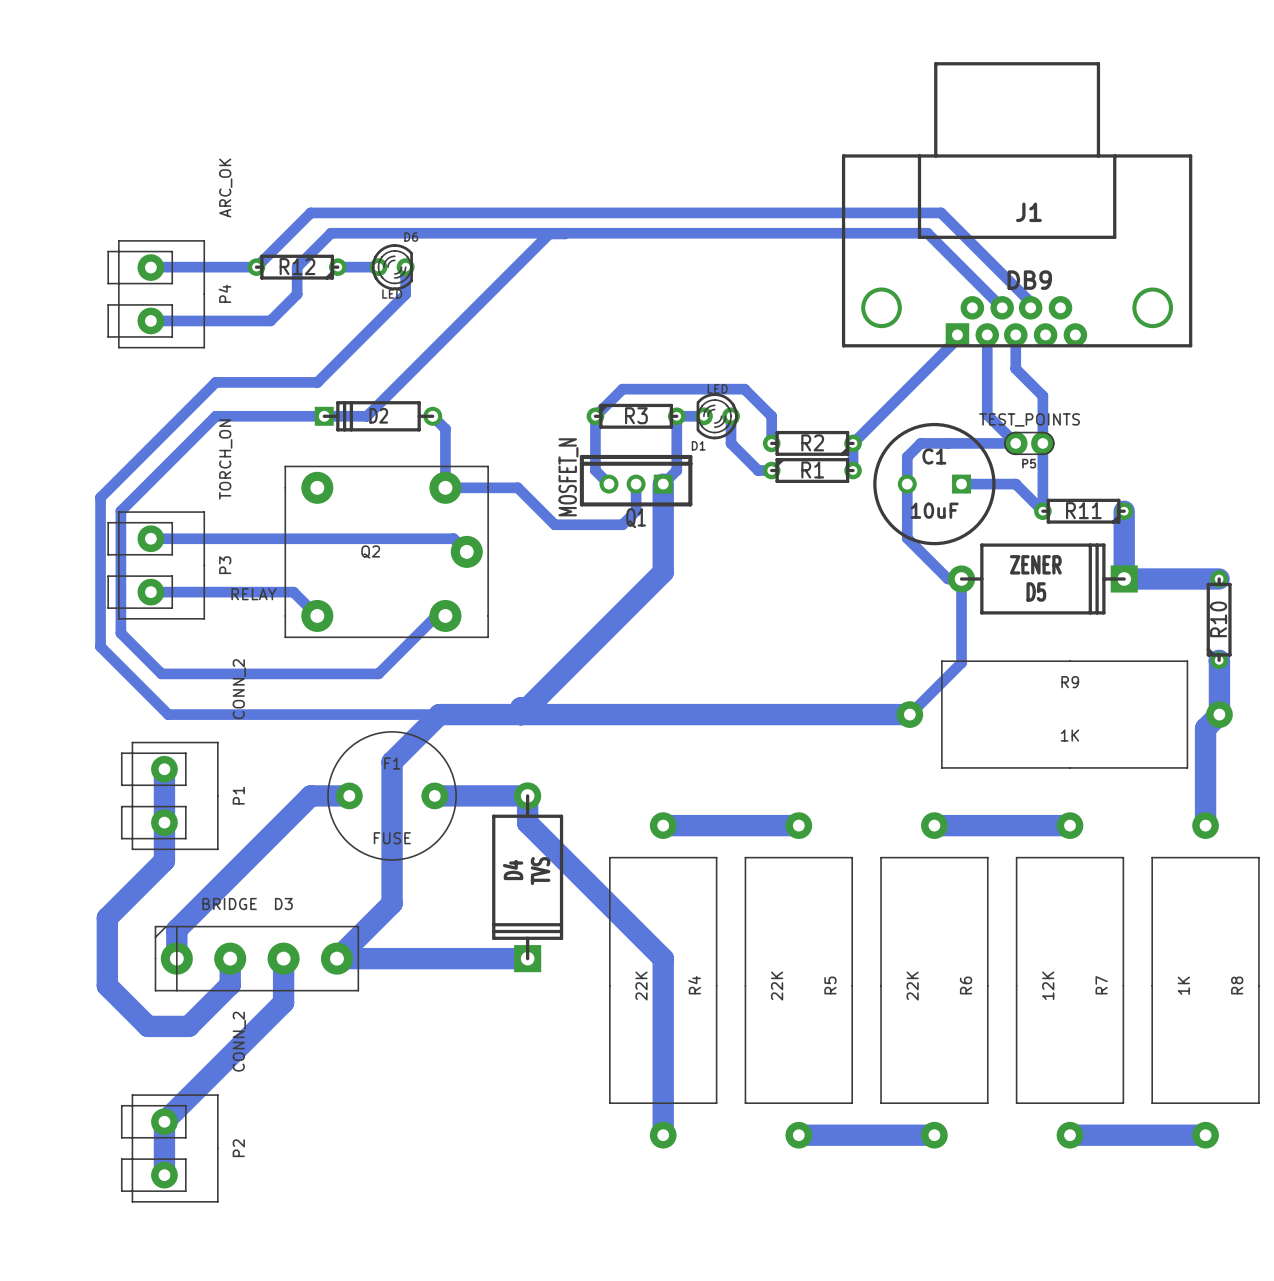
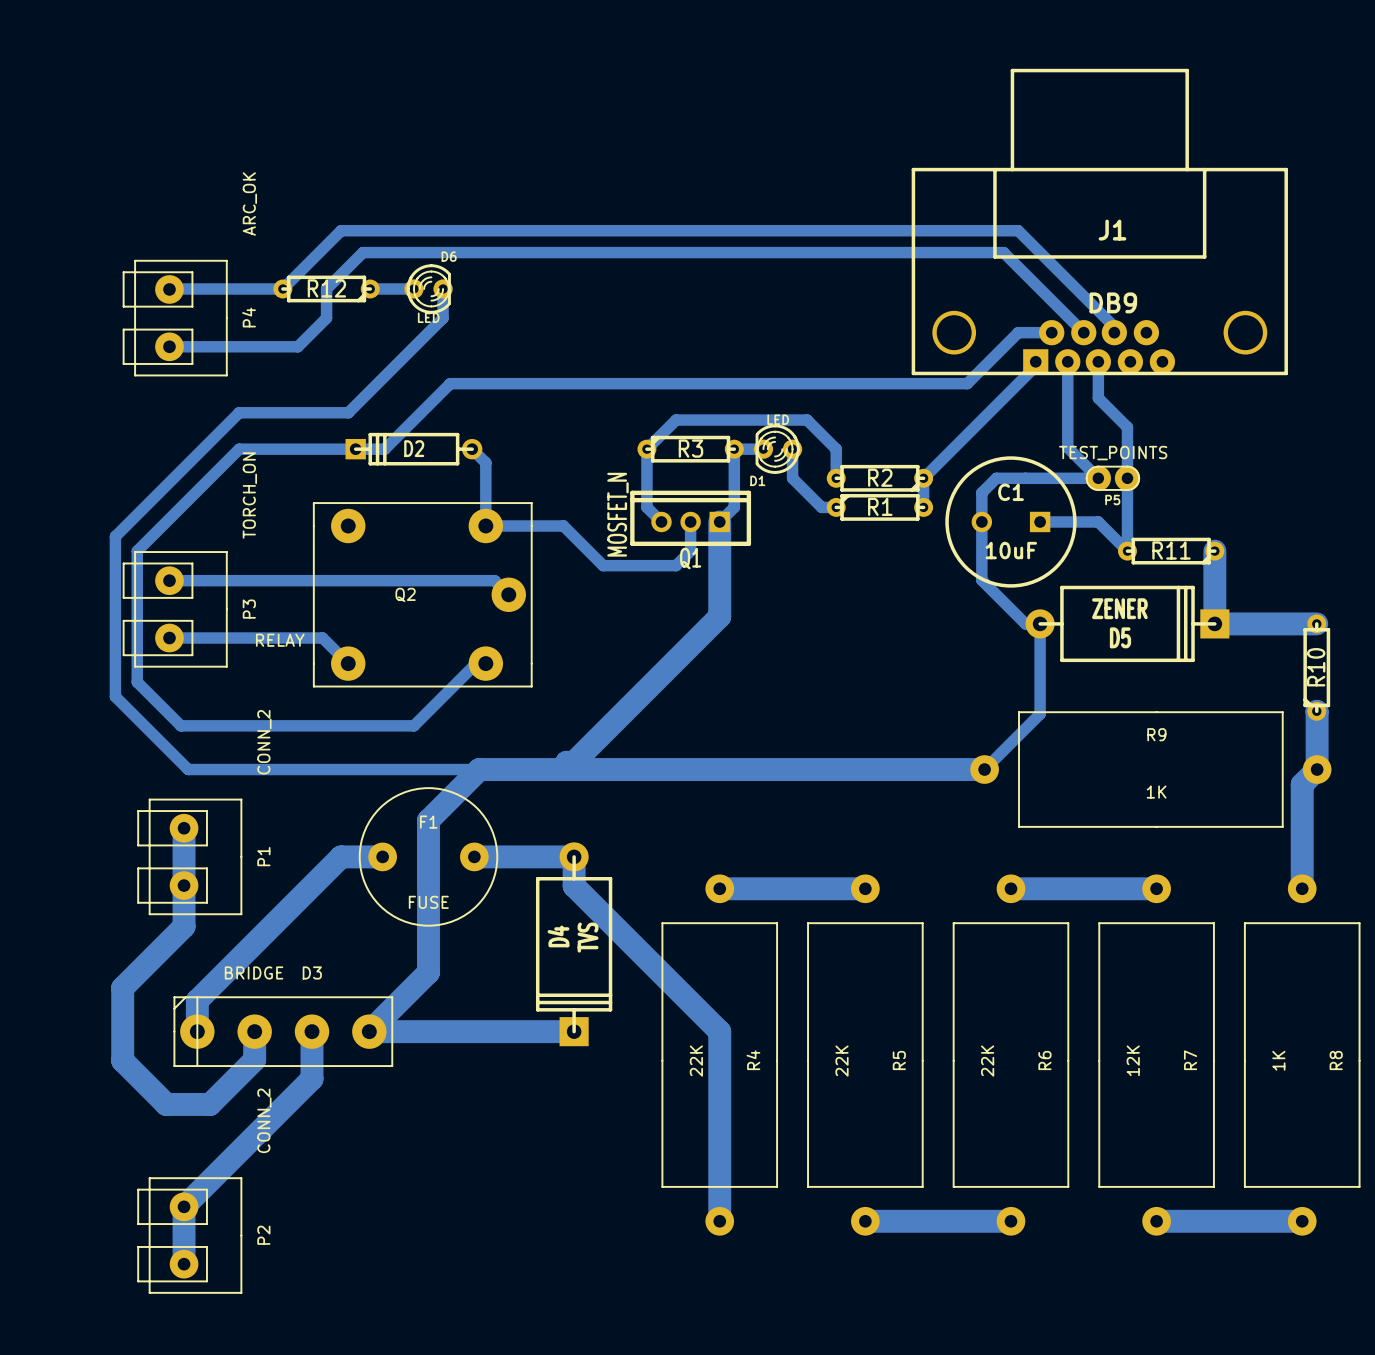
bottom track: (564, 233) (549, 233) (366, 416) (351, 416) -> (1051, 332) (1018, 332) (967, 383) (450, 383) (384, 449)

